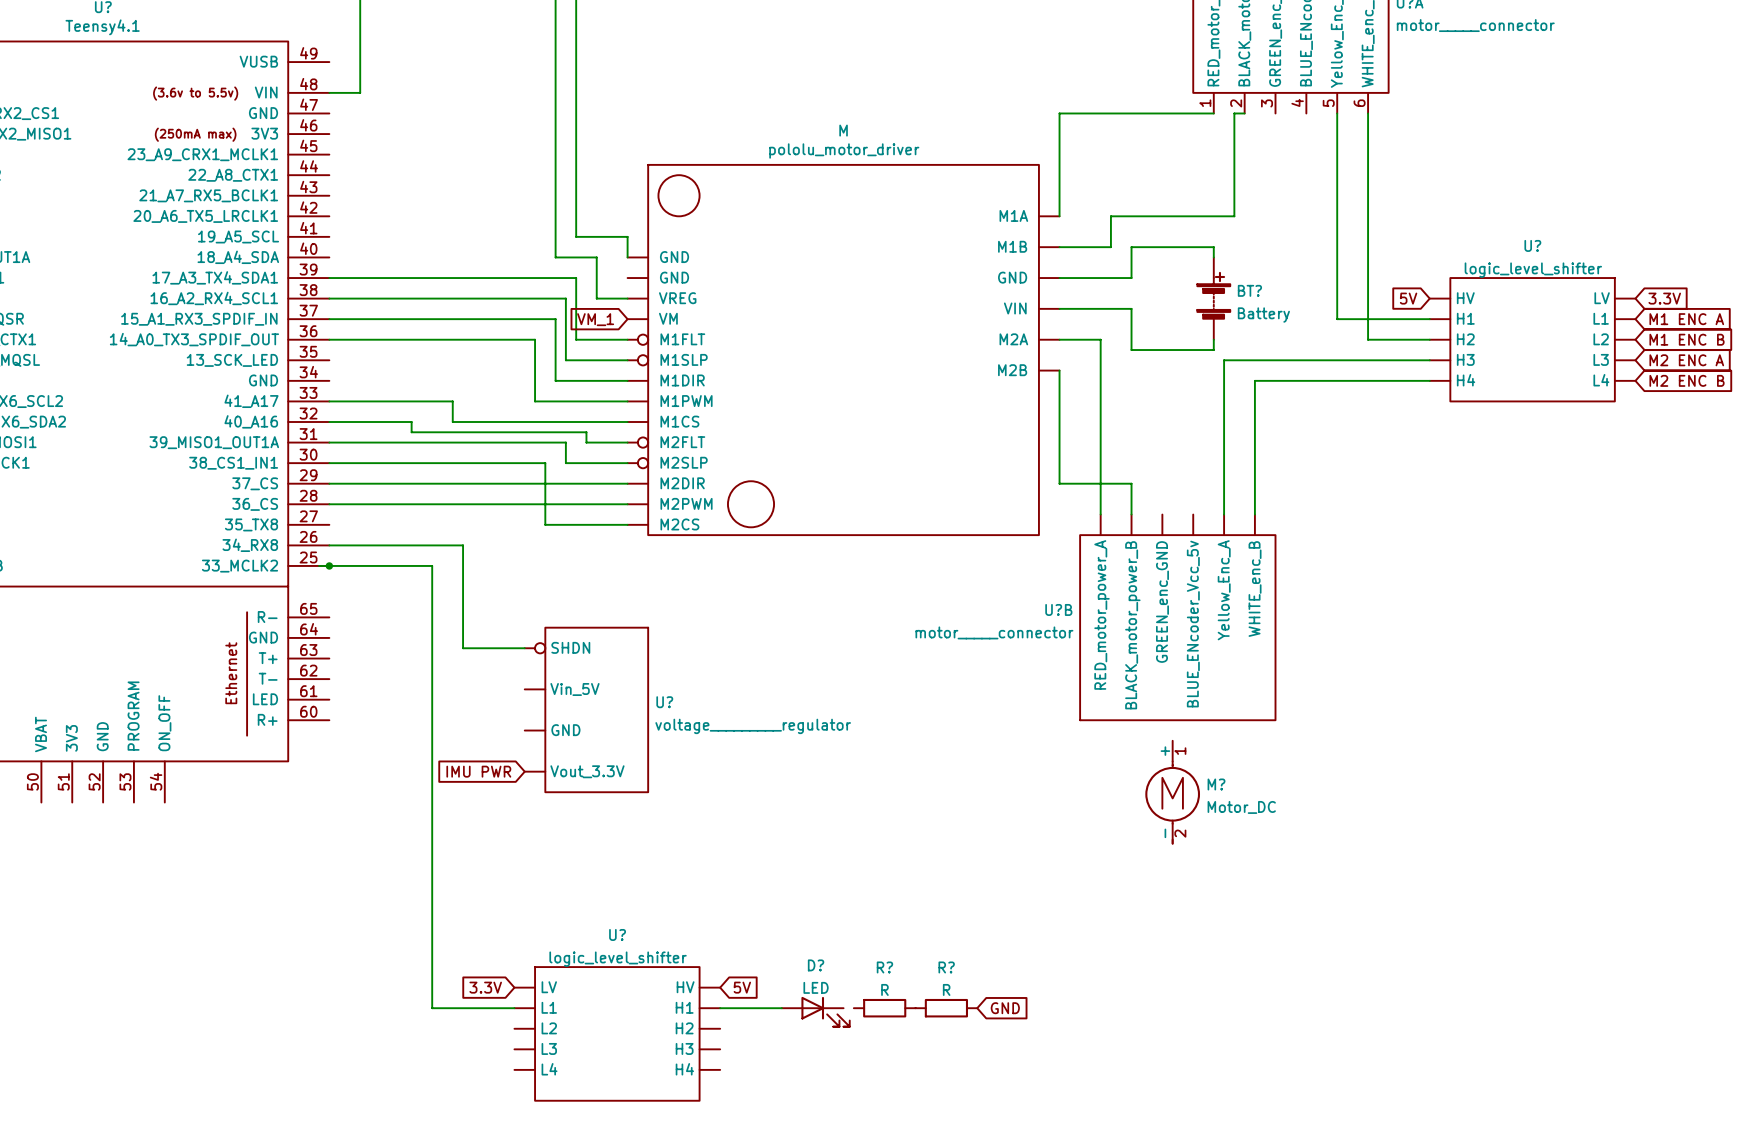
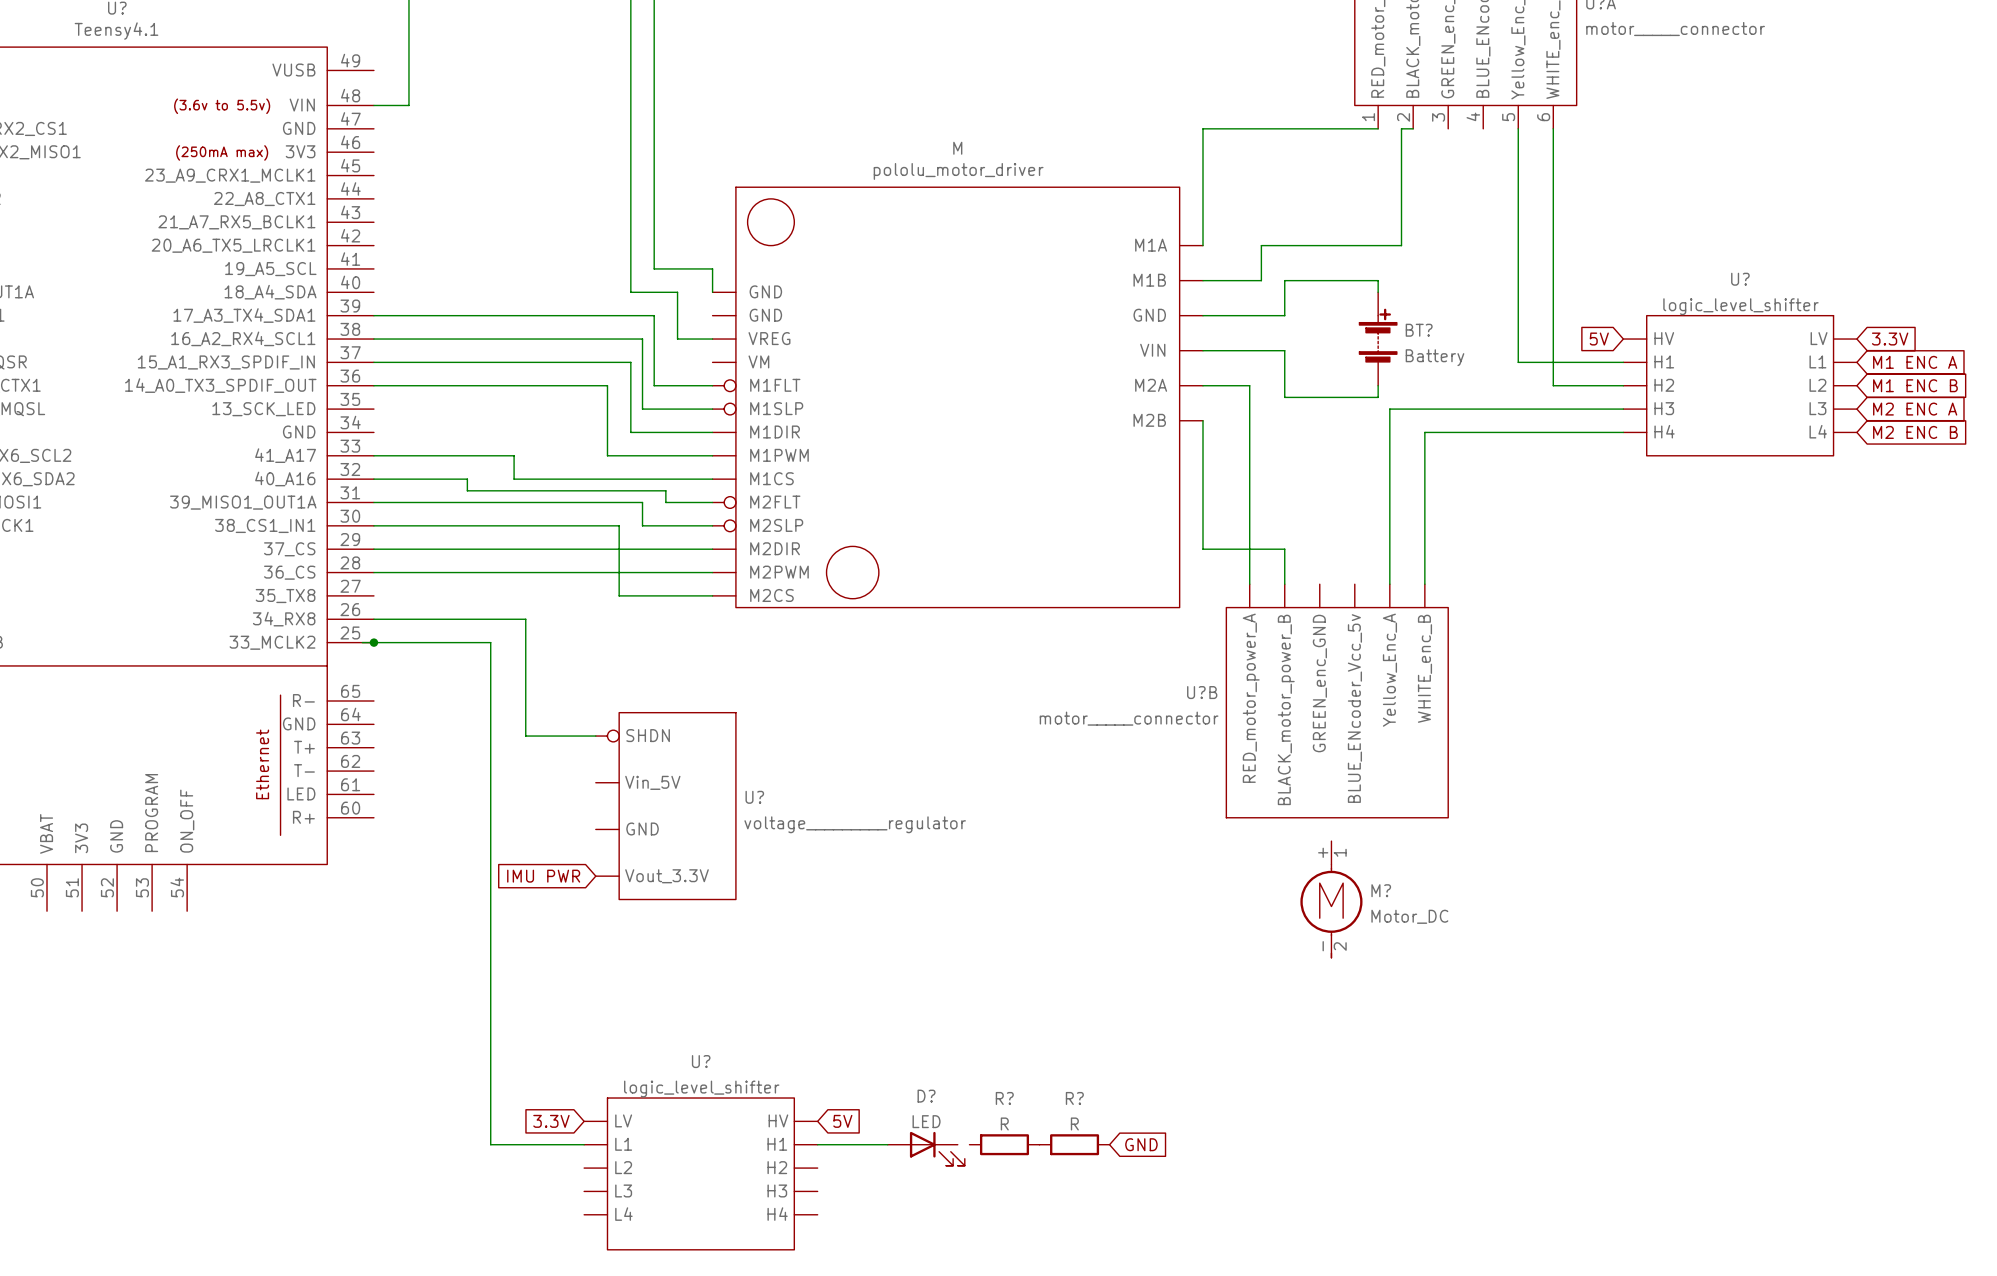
global label: VM_1 (595, 319) -> none

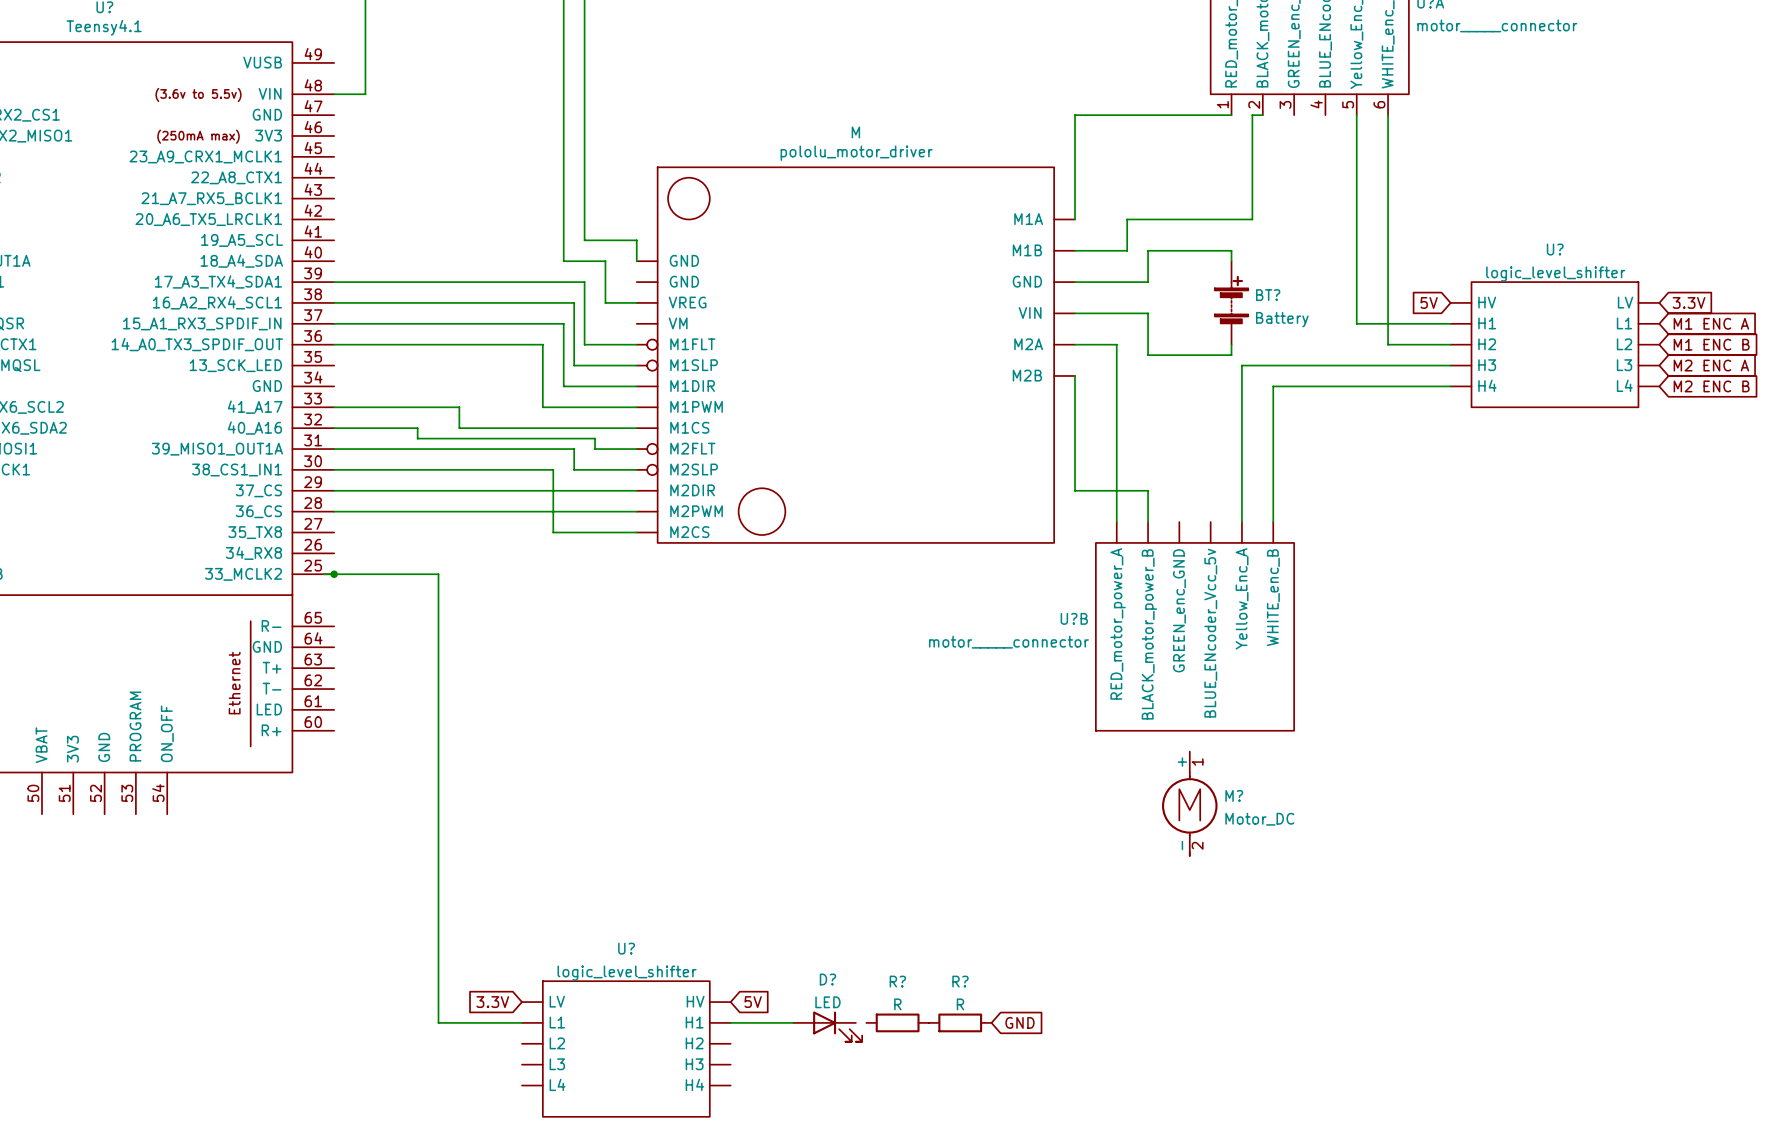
wire: (373, 619) (525, 619) (525, 736) (595, 736) -> none
U?: voltage_________regulator (666, 806) -> none
global label: IMU PWR (543, 876) -> none

